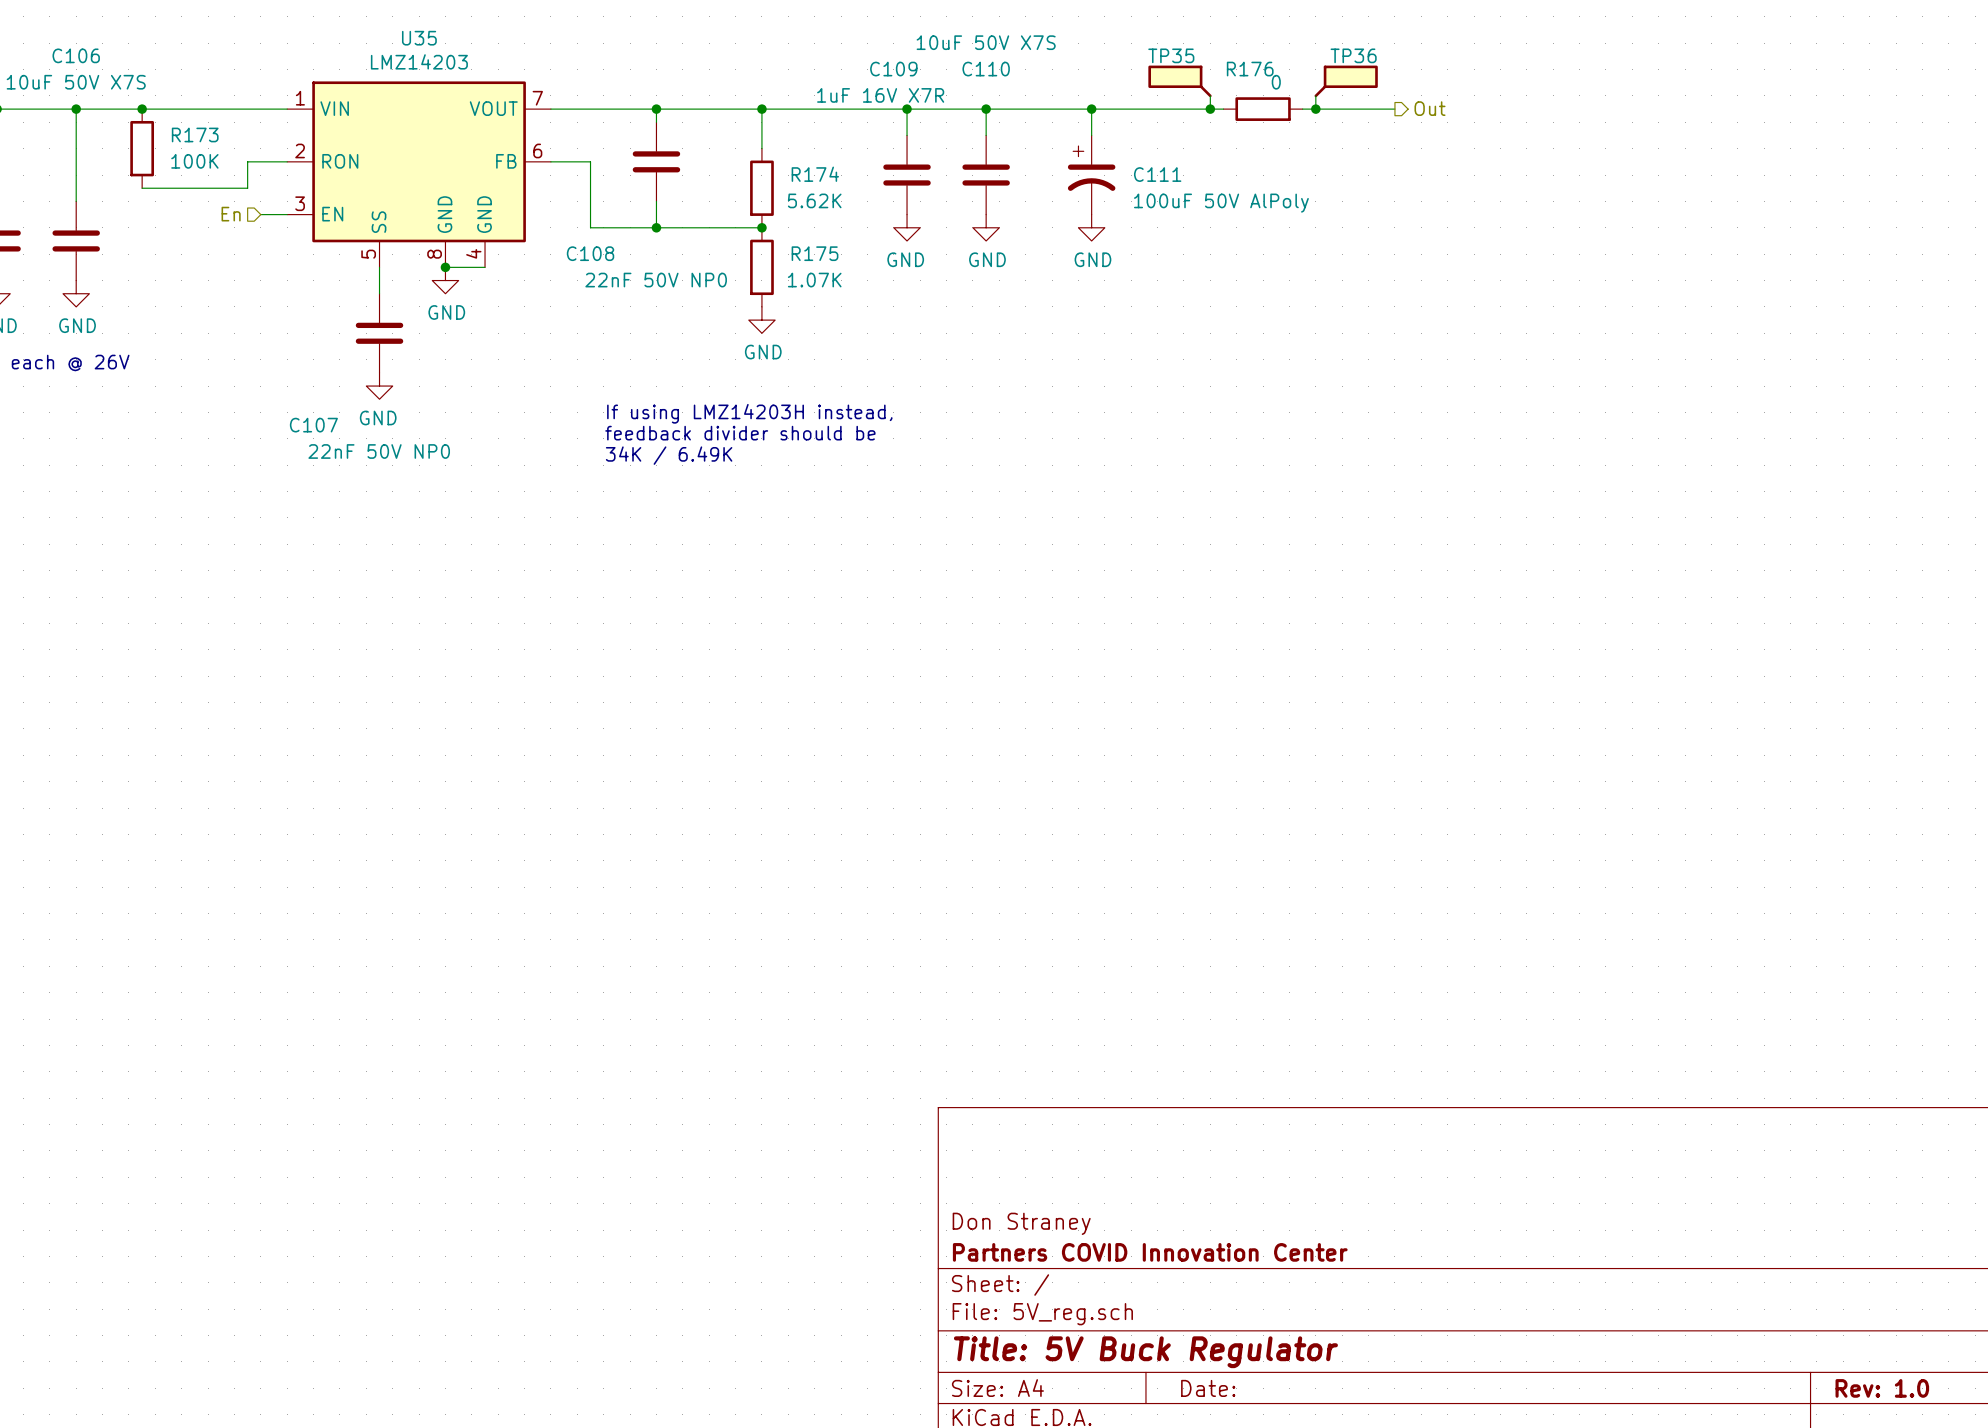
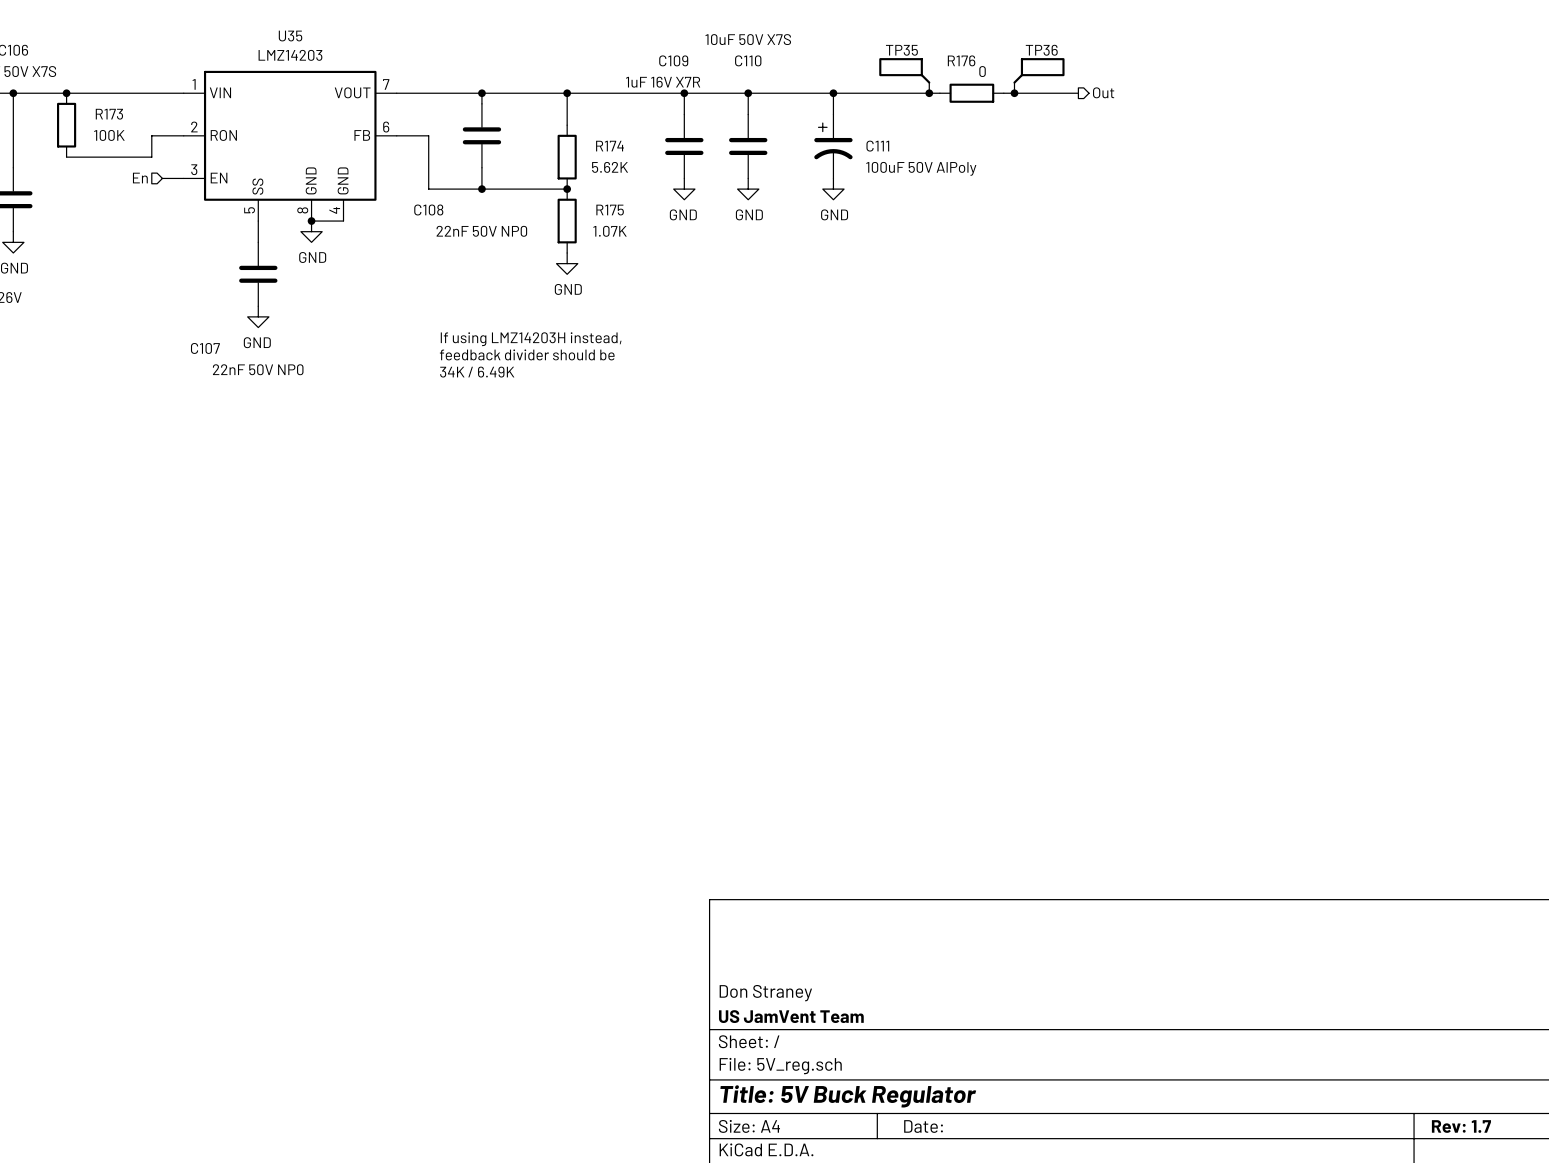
title block: Partners COVID Innovation Center (1150, 1252) -> US JamVent Team (791, 1016)
title block: Rev: 1.0 (1882, 1388) -> Rev: 1.7 (1461, 1126)

